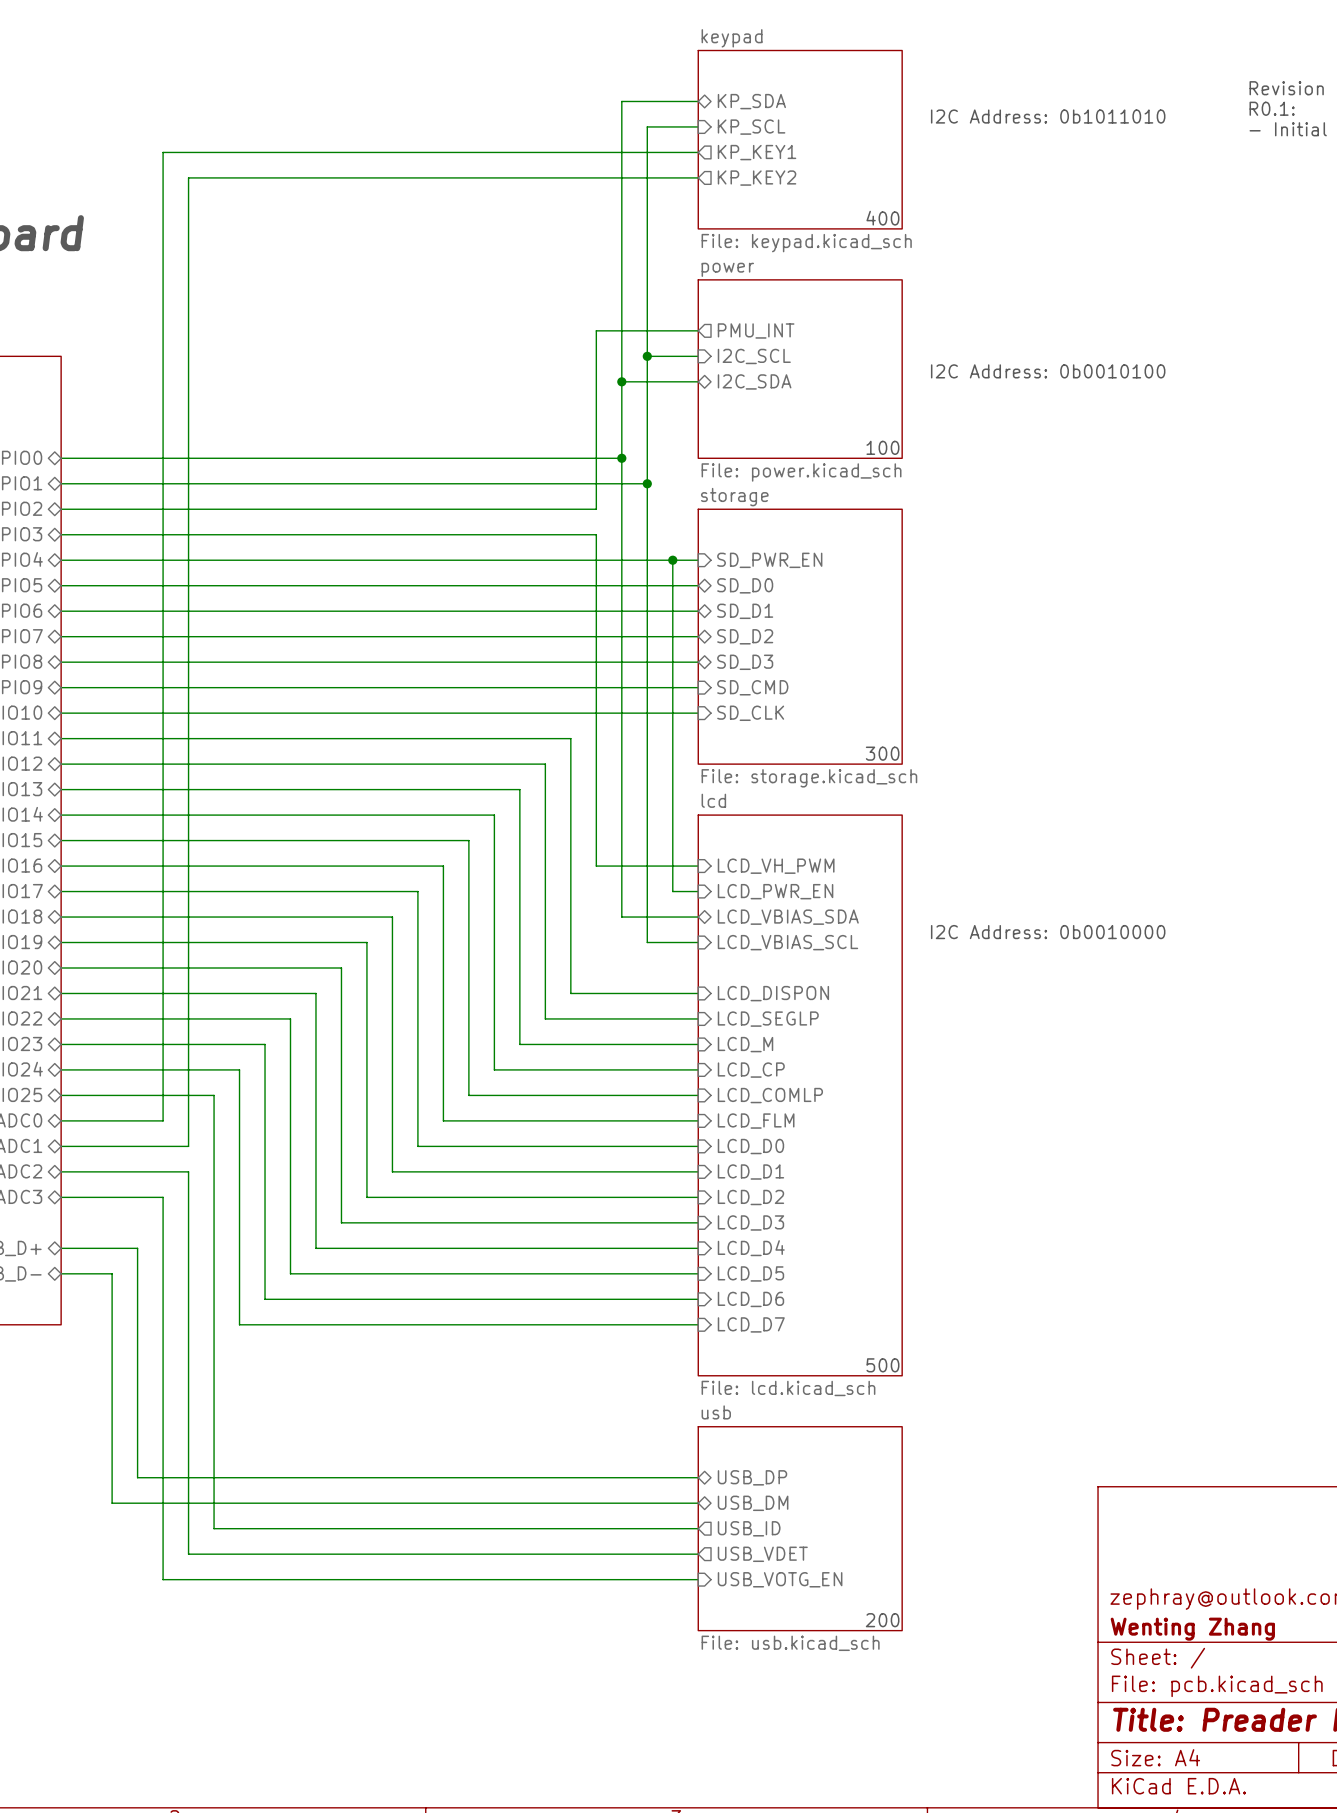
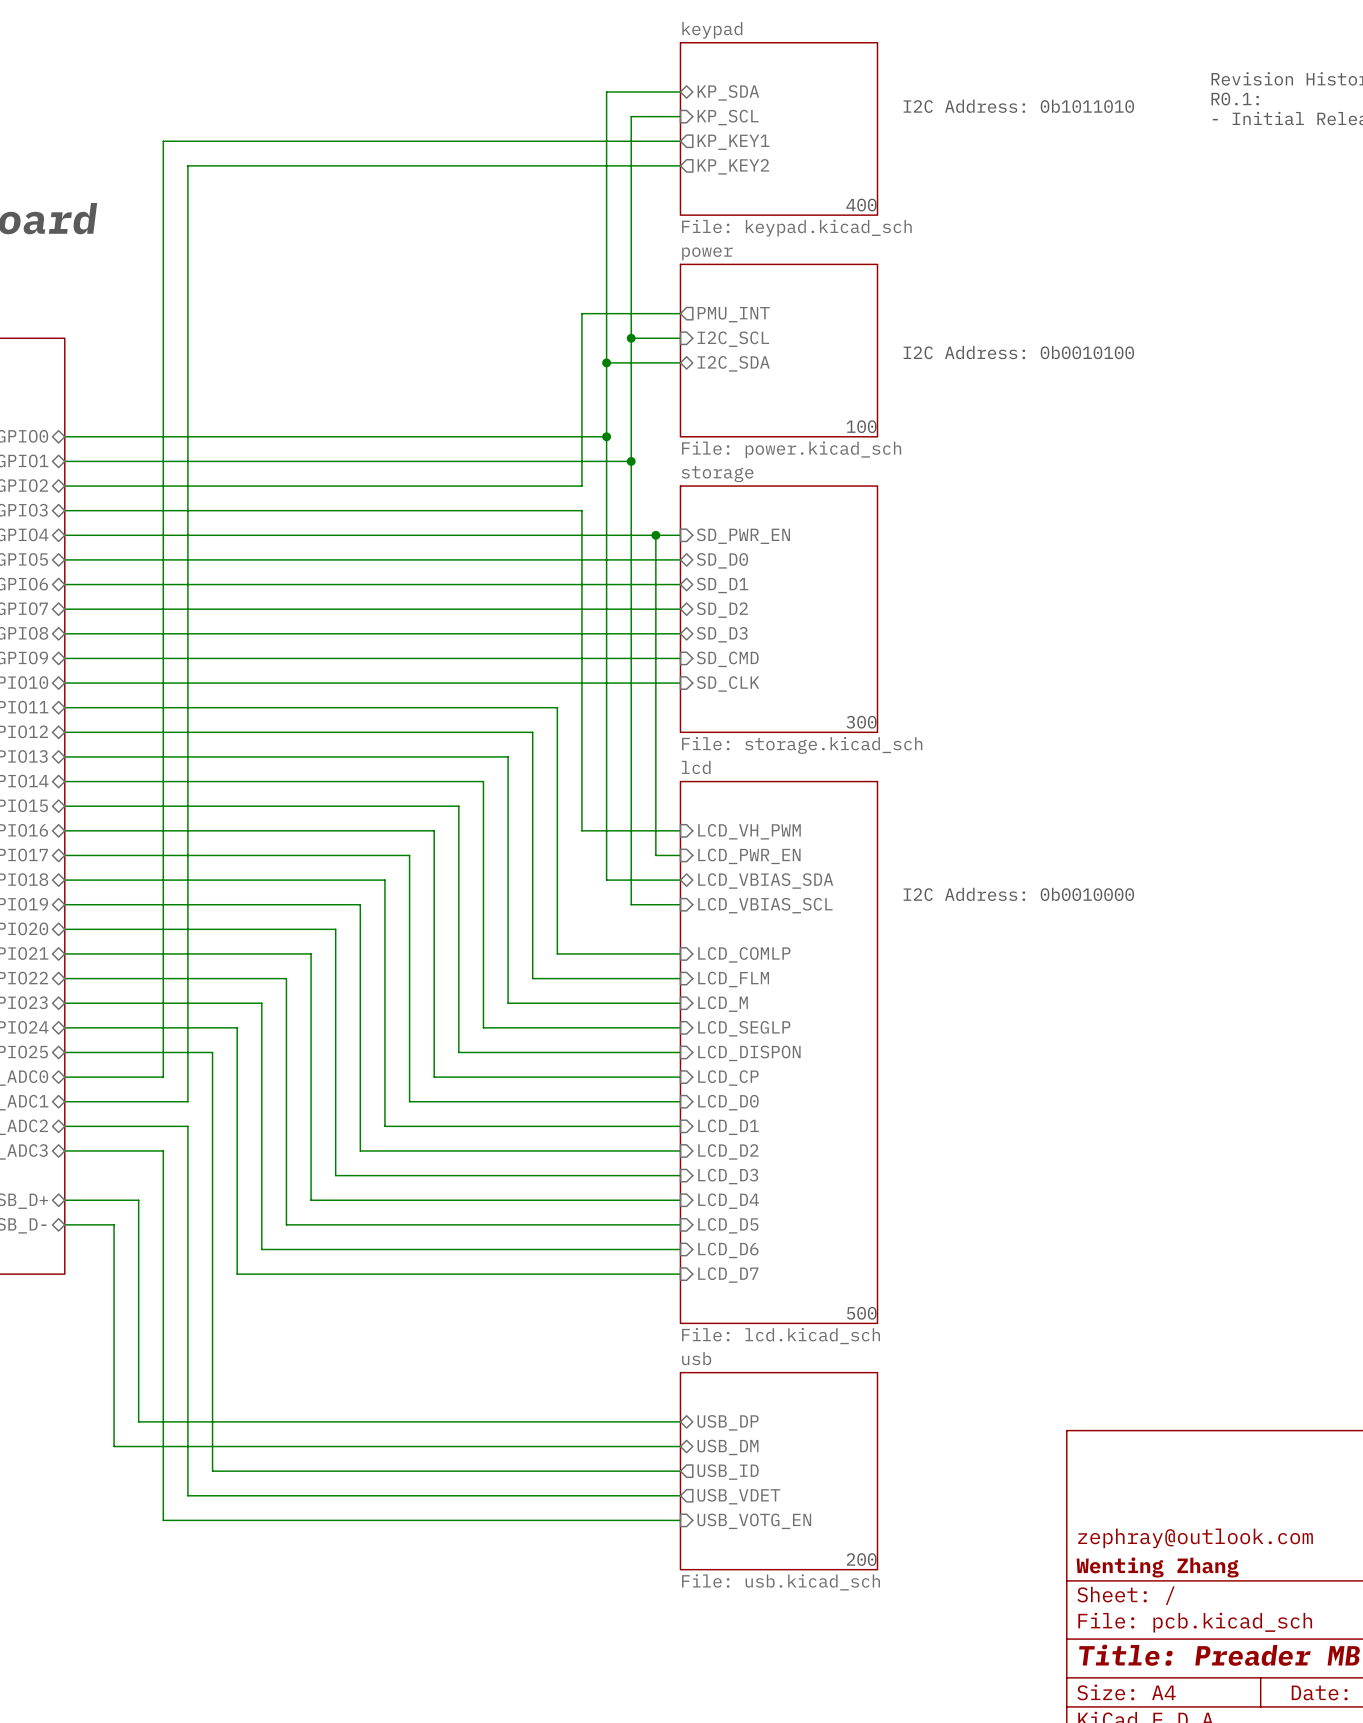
sheet pin: LCD_DISPON (773, 993) -> LCD_COMLP (744, 954)
sheet pin: LCD_SEGLP (768, 1019) -> LCD_FLM (733, 979)
sheet pin: LCD_CP (751, 1070) -> LCD_SEGLP (744, 1028)
sheet pin: LCD_COMLP (770, 1095) -> LCD_DISPON (749, 1053)
sheet pin: LCD_FLM (756, 1121) -> LCD_CP (728, 1078)

